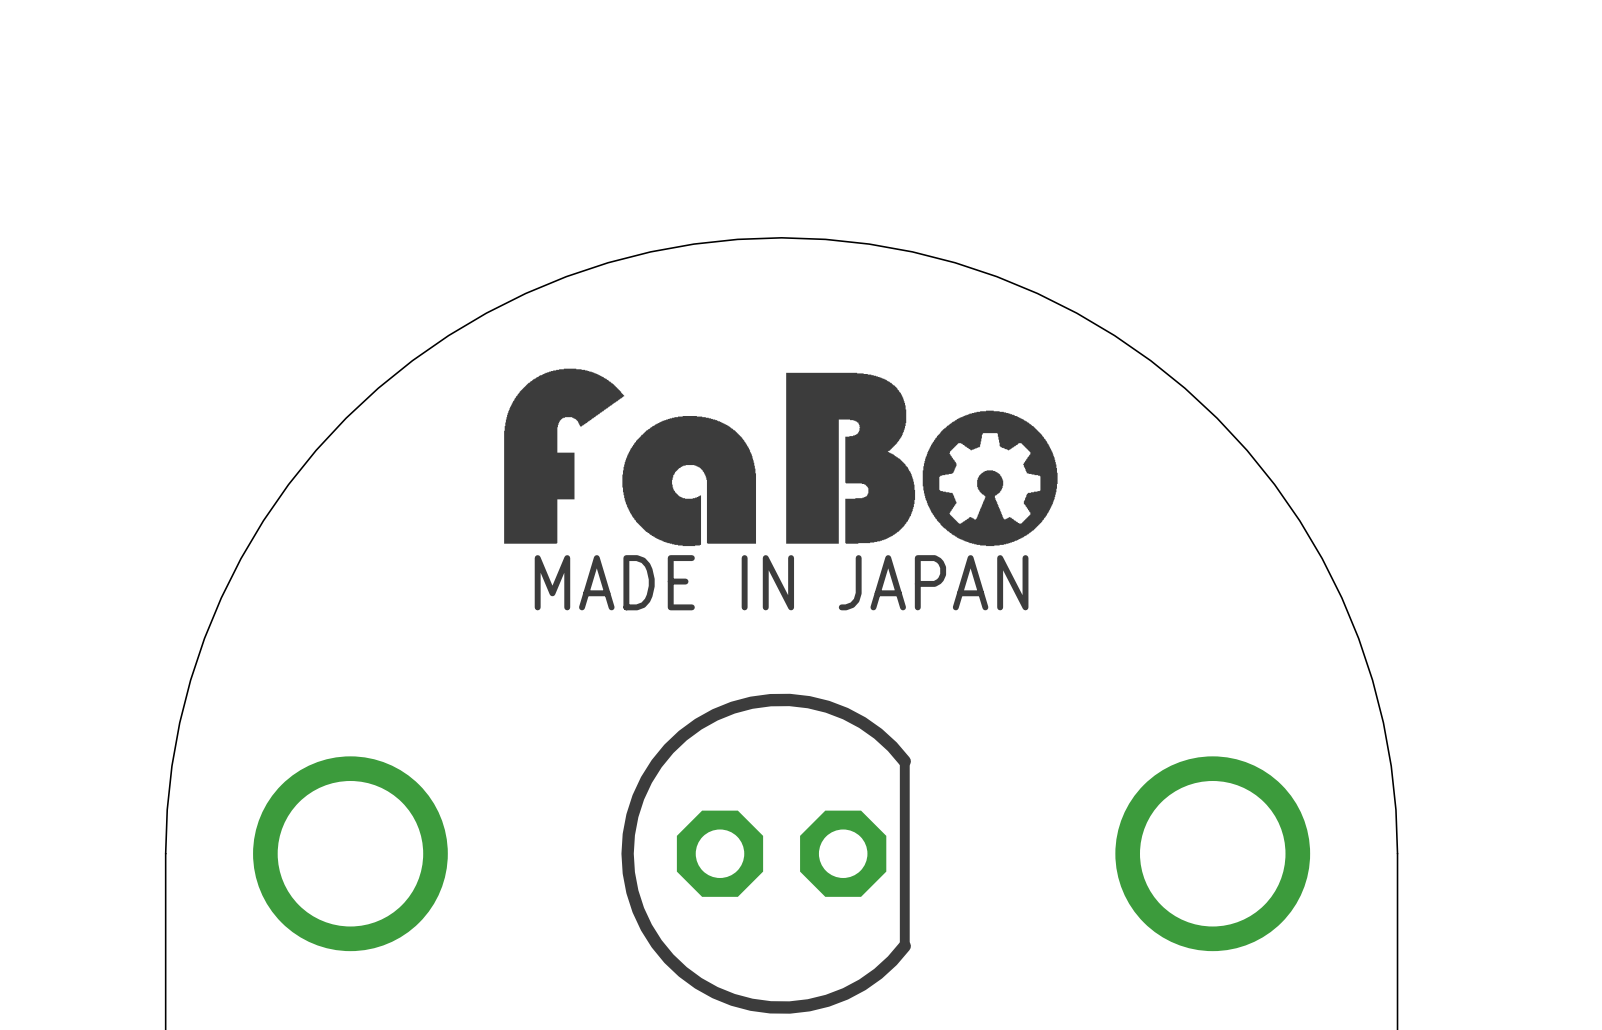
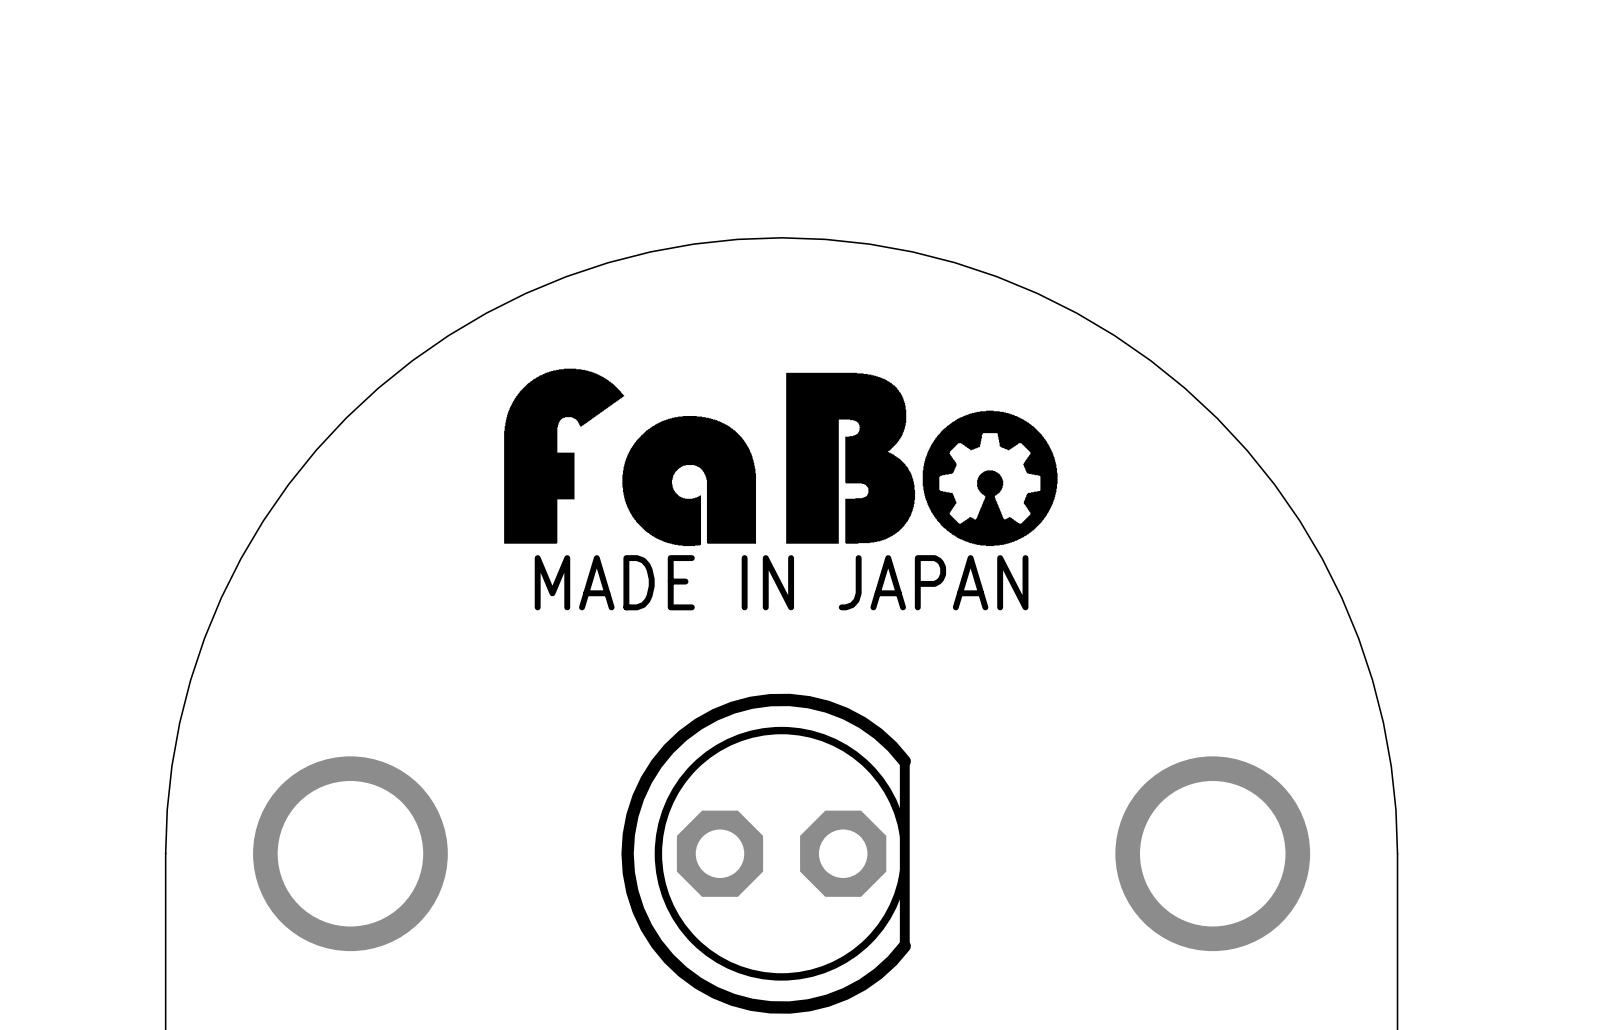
part footprint: [621, 693, 911, 1014] -> [621, 693, 911, 1014]

